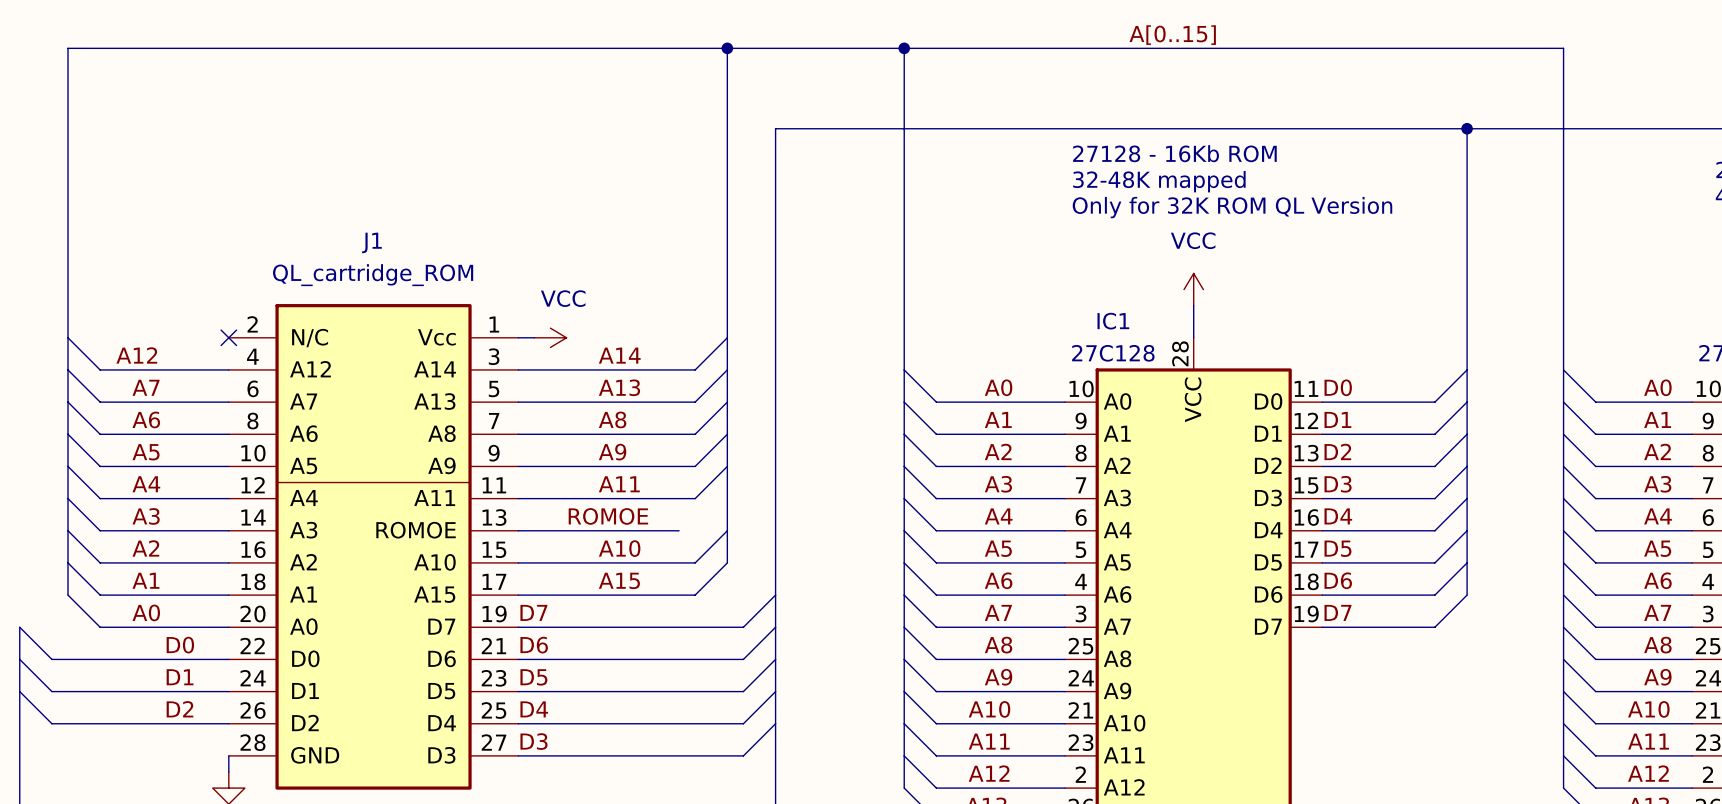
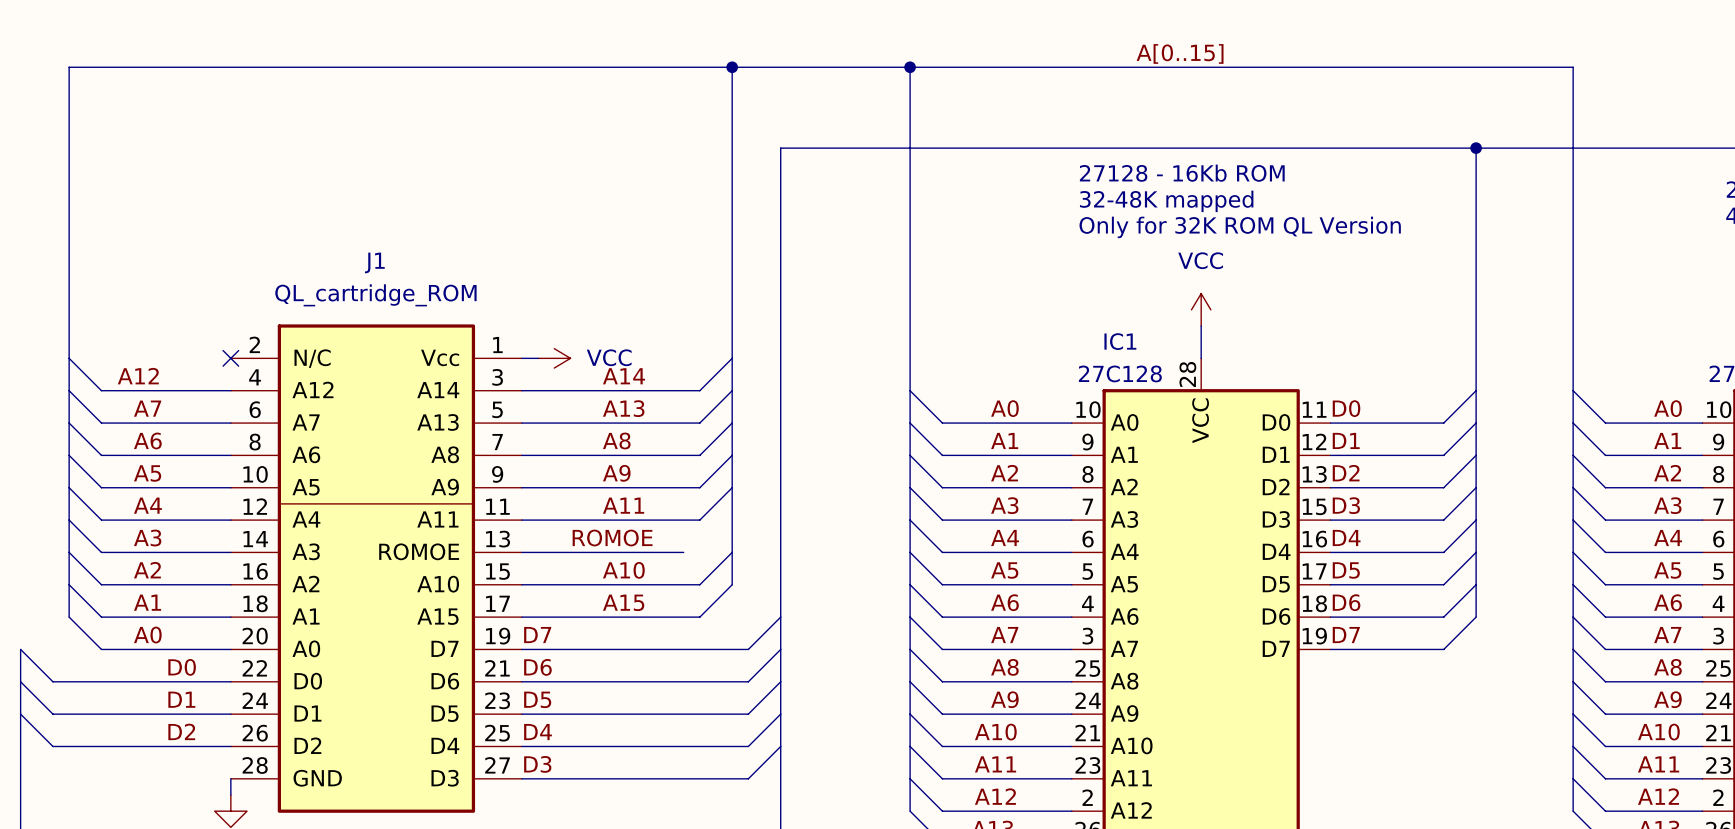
power symbol text position: VCC (563, 298) -> VCC (609, 357)

